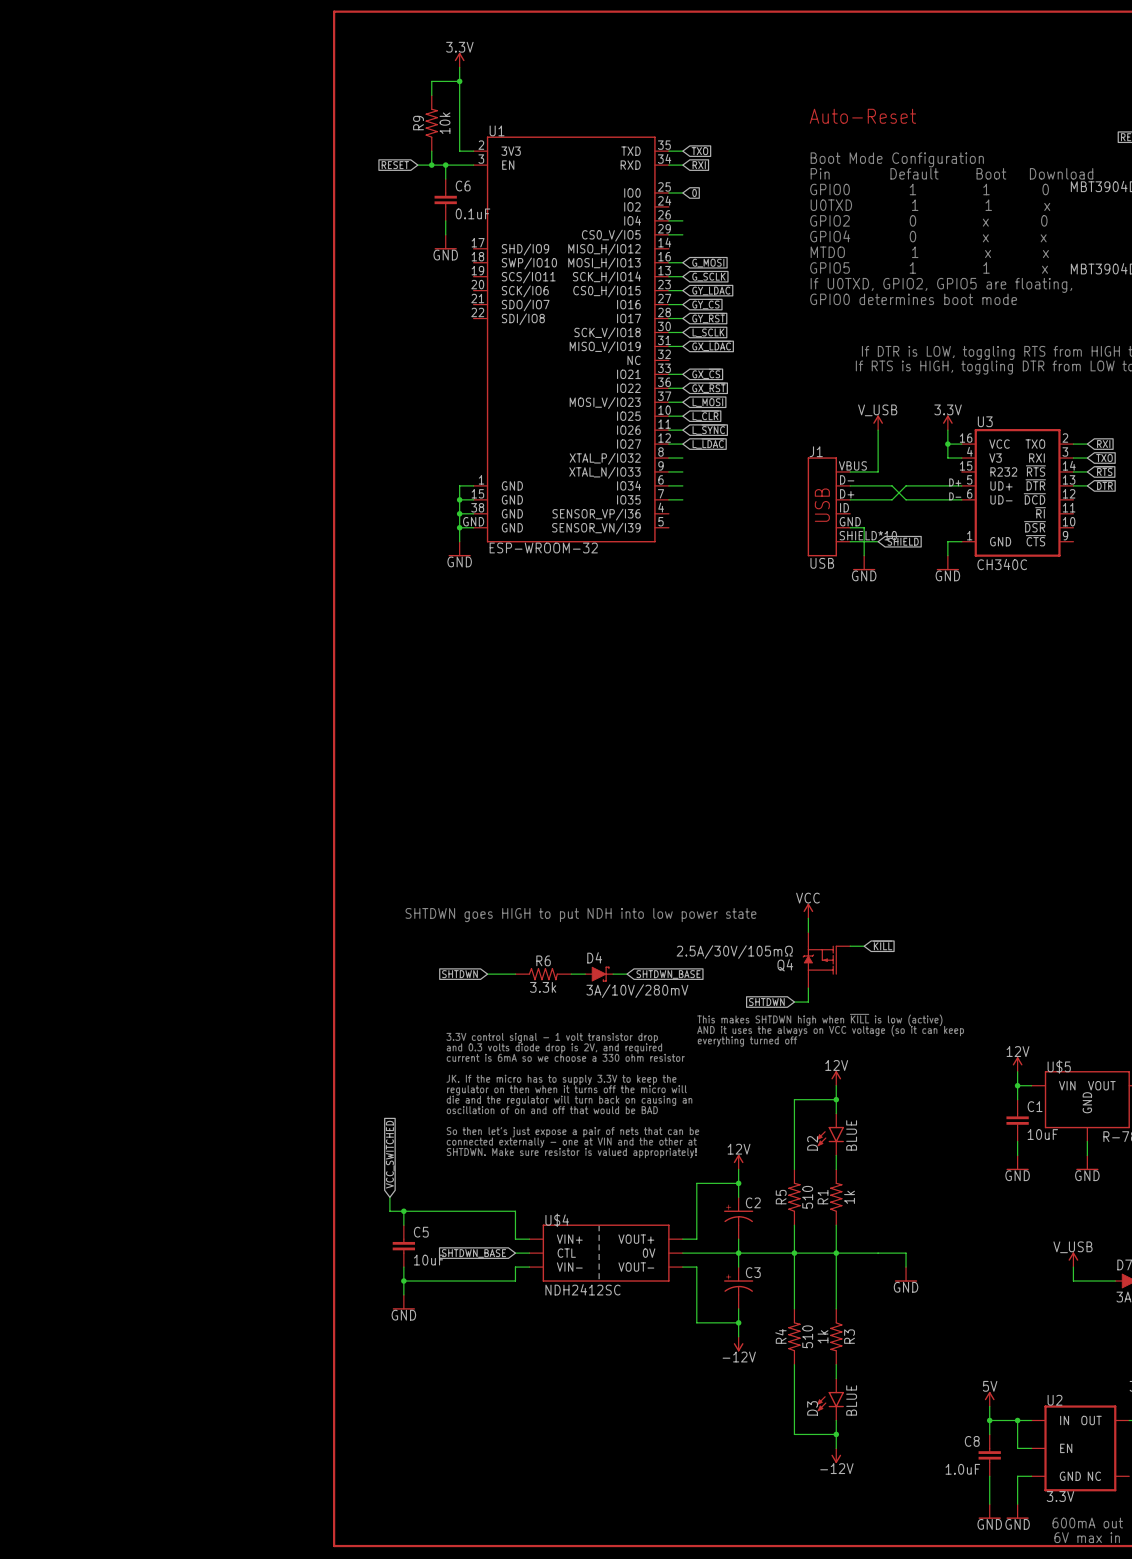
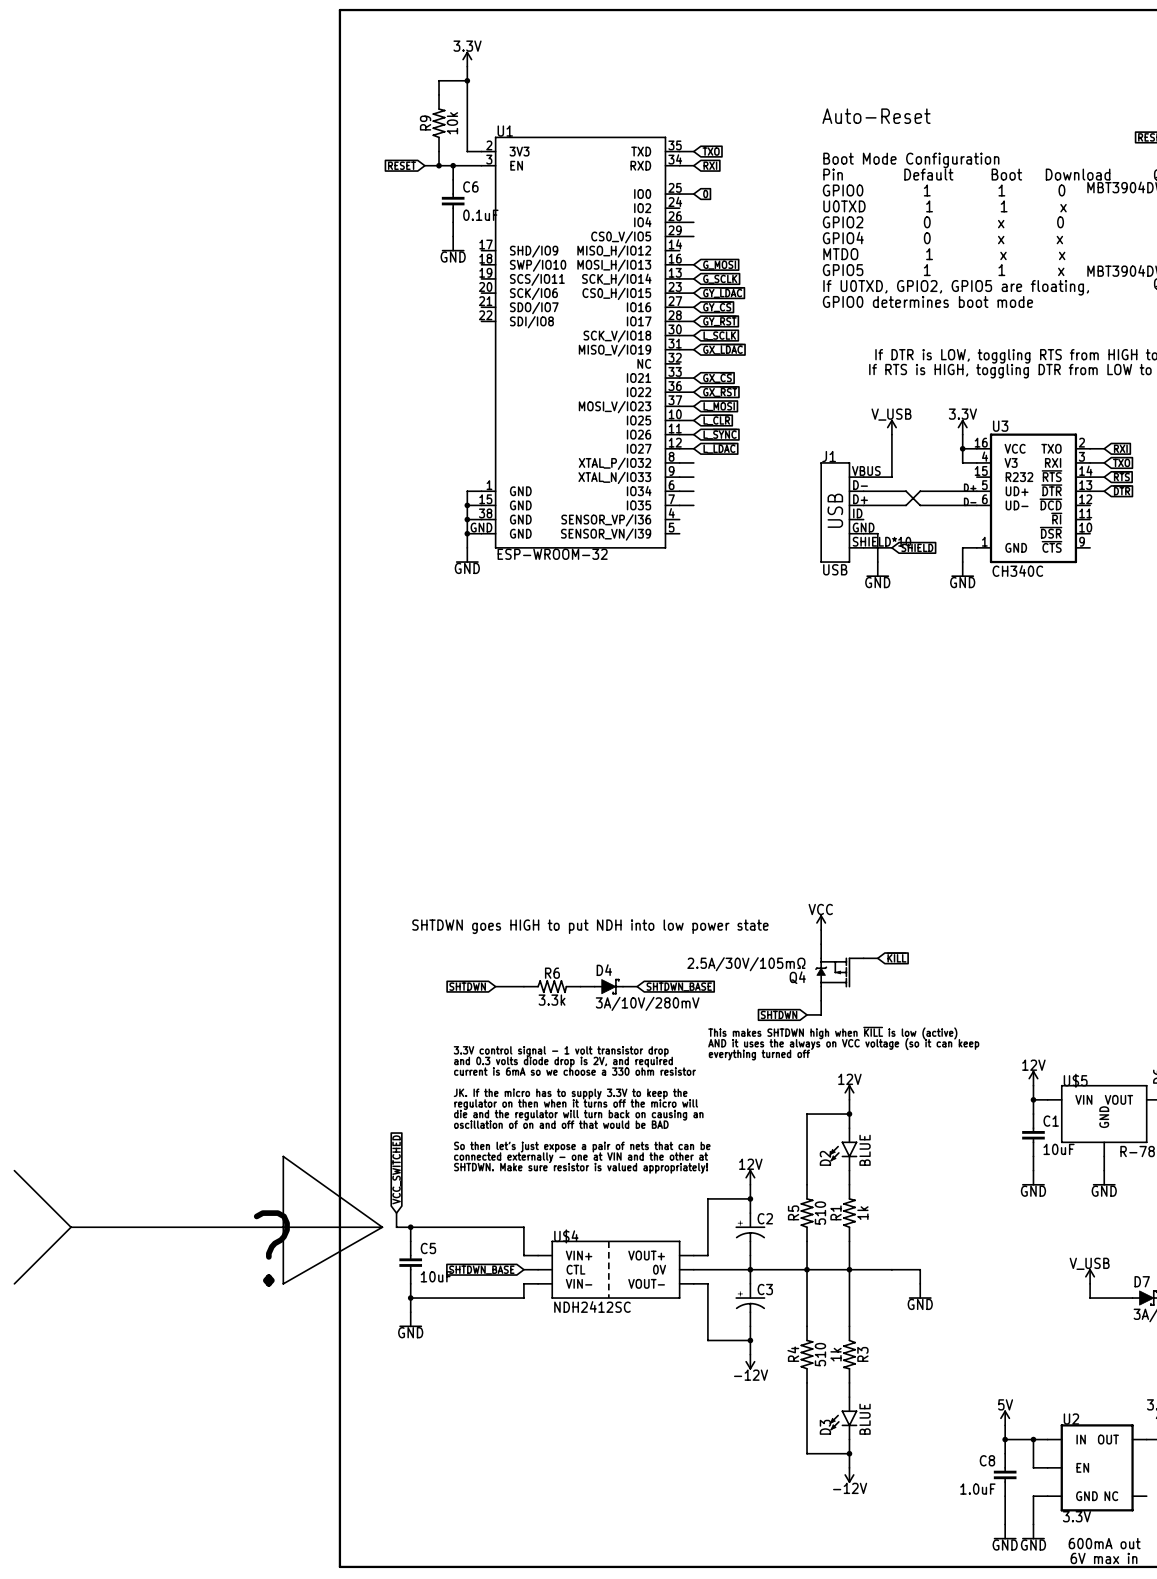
line: none -> (14, 1170) (71, 1227)
line: none -> (71, 1227) (382, 1227)
line: none -> (71, 1227) (14, 1283)
line: none -> (382, 1227) (283, 1156) (283, 1283) (382, 1227)
text: none -> ? (271, 1248)

